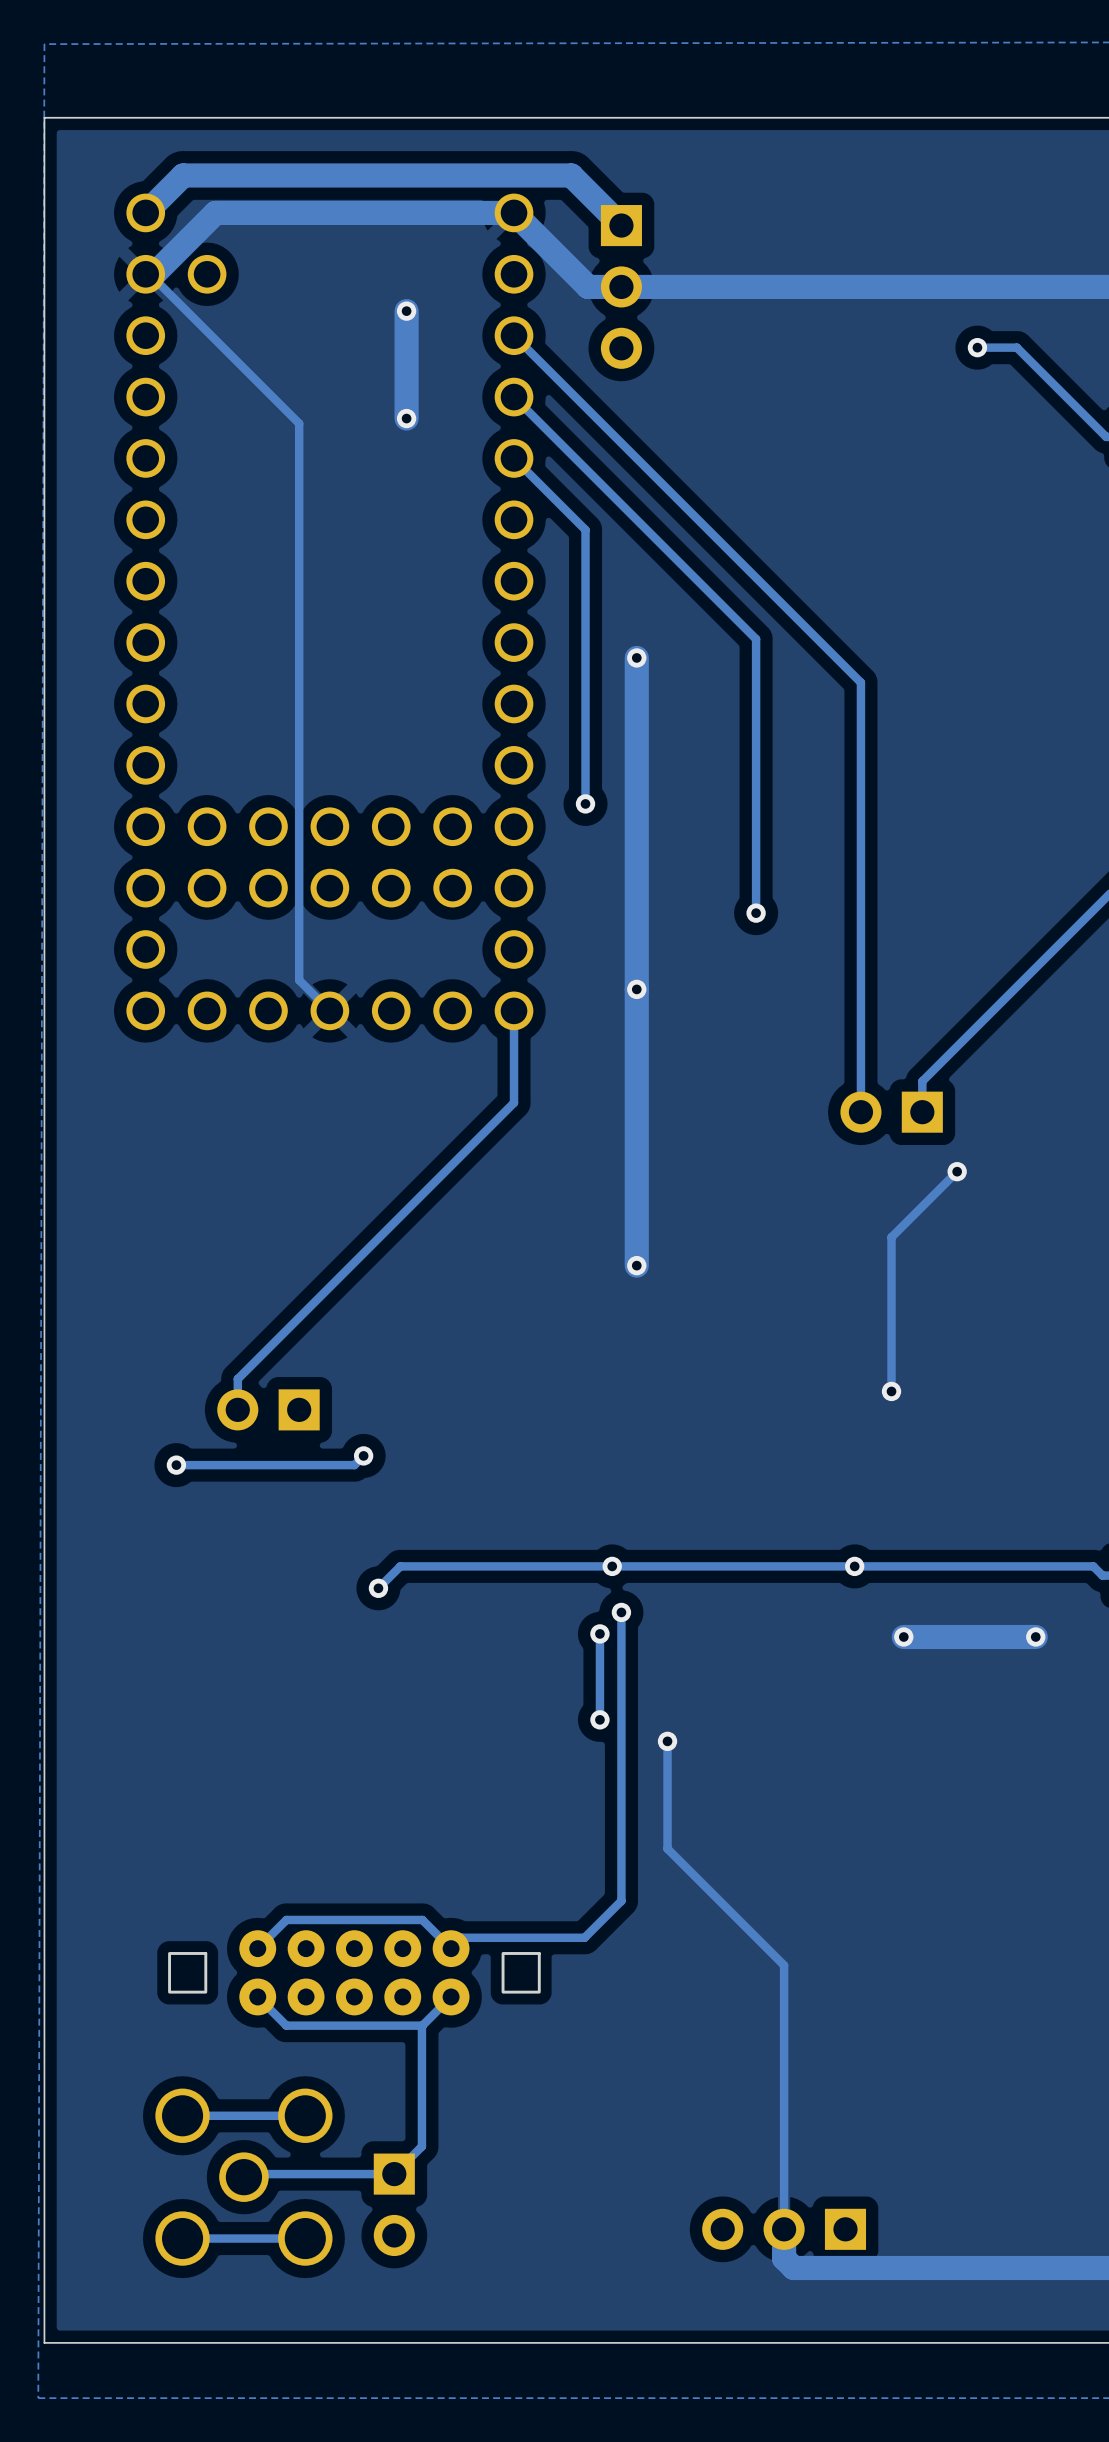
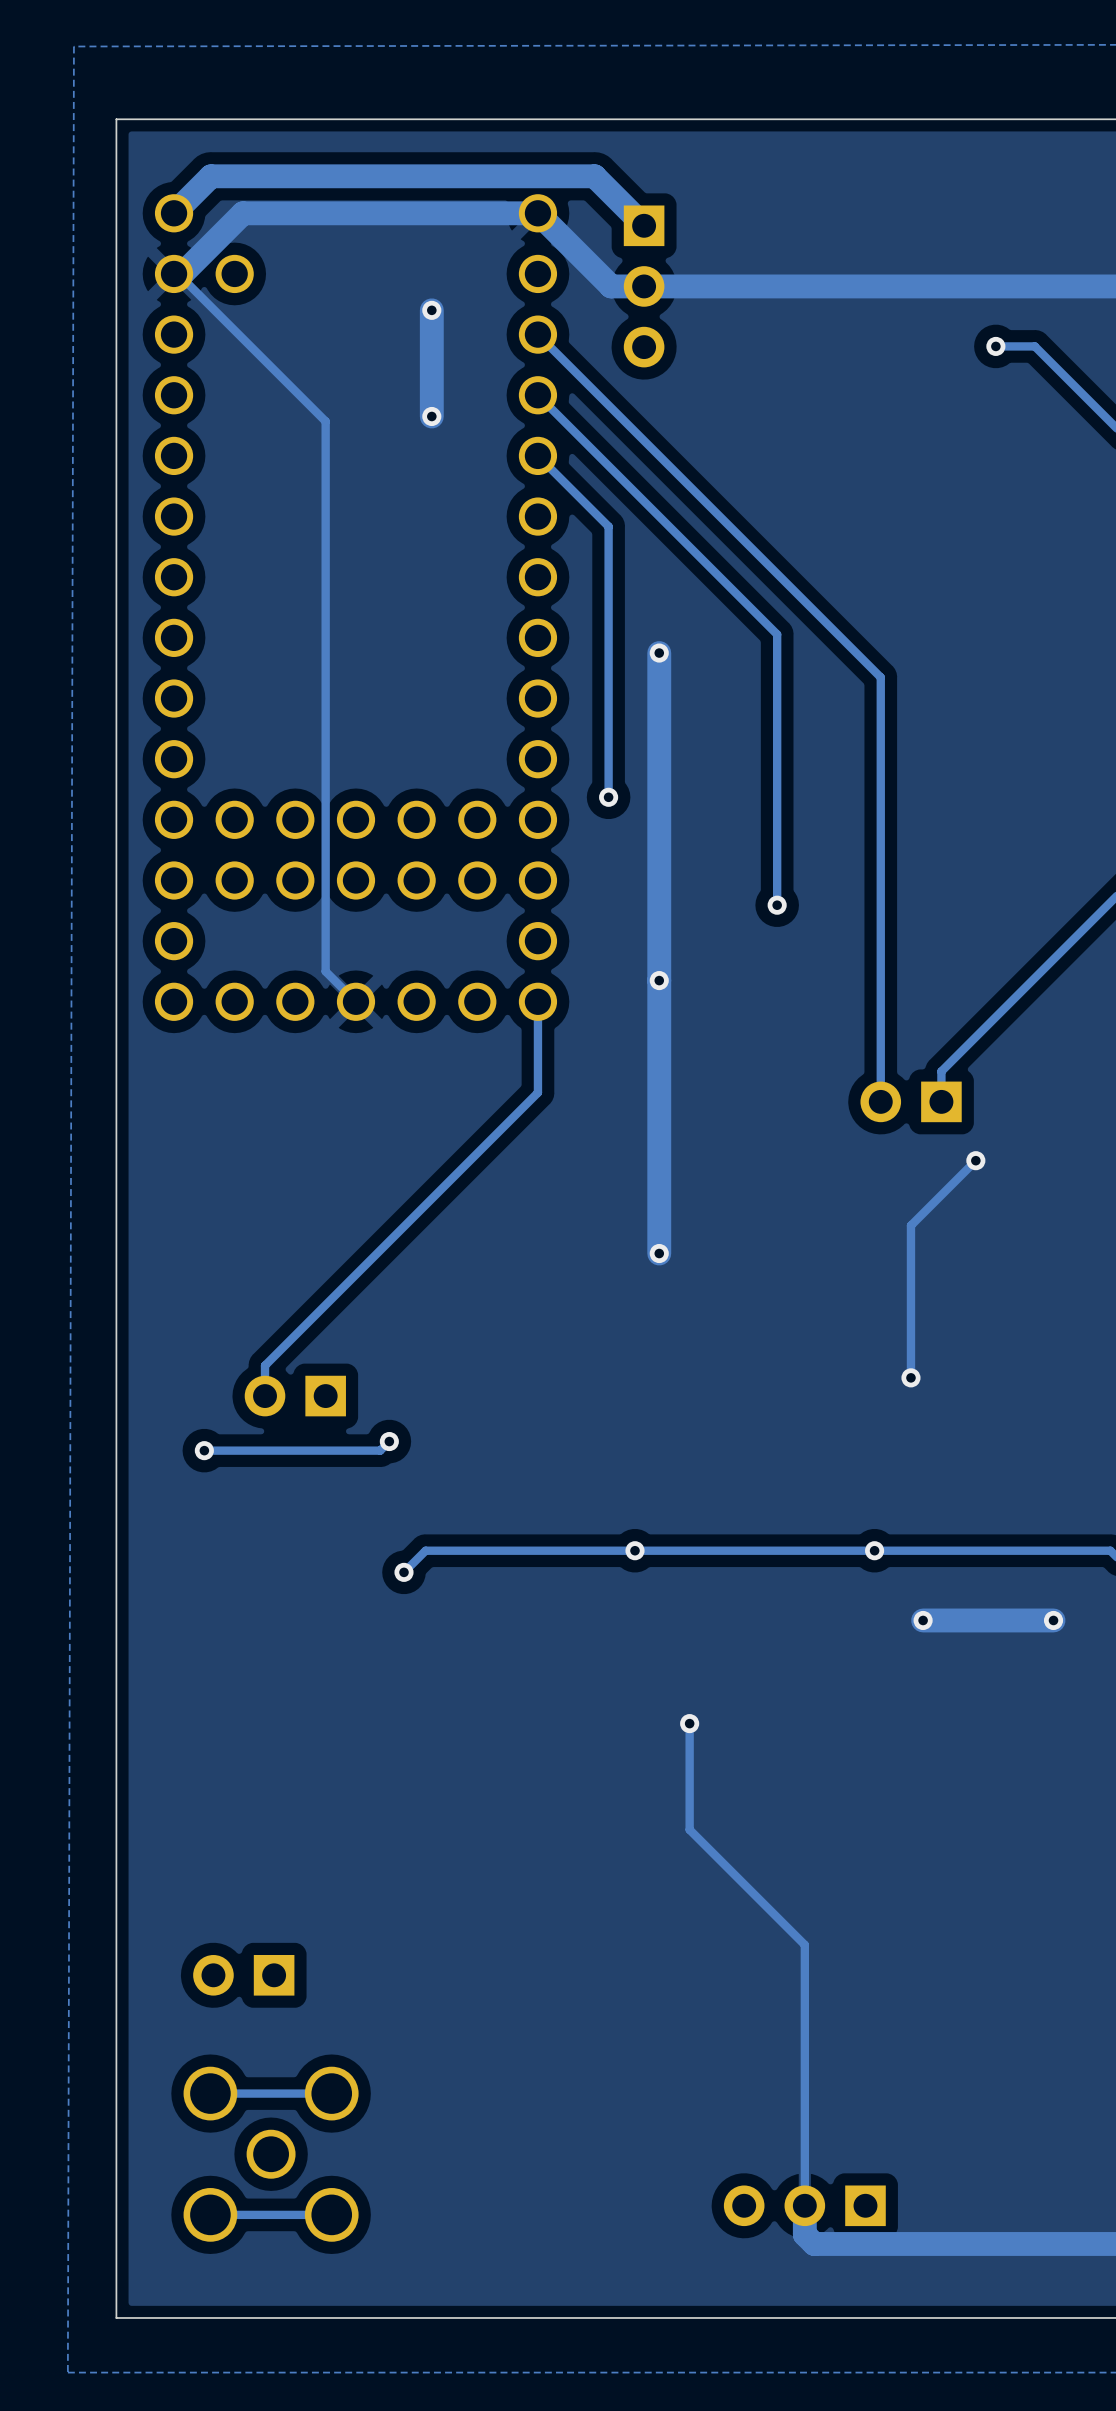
board edge: (87, 117) (44, 117) (44, 2342) (87, 2342) -> (116, 119) (116, 2317)
track: (621, 1612) (621, 1900) (584, 1937) (461, 1937) (451, 1948) (422, 1919) (286, 1919) (257, 1948) -> none
via: (621, 1612) -> none
track: (599, 1633) (599, 1719) -> none
via: (599, 1633) -> none
via: (599, 1719) -> none
part: (354, 1972) -> none
track: (257, 1996) (286, 2025) (422, 2025) -> none
track: (451, 1996) (421, 2026) (421, 2146) (394, 2174) (247, 2174) (243, 2177) -> none
part rotation: 0° (394, 2204) -> 90° clockwise (243, 1975)
part position: (394, 2204) -> (243, 1975)

